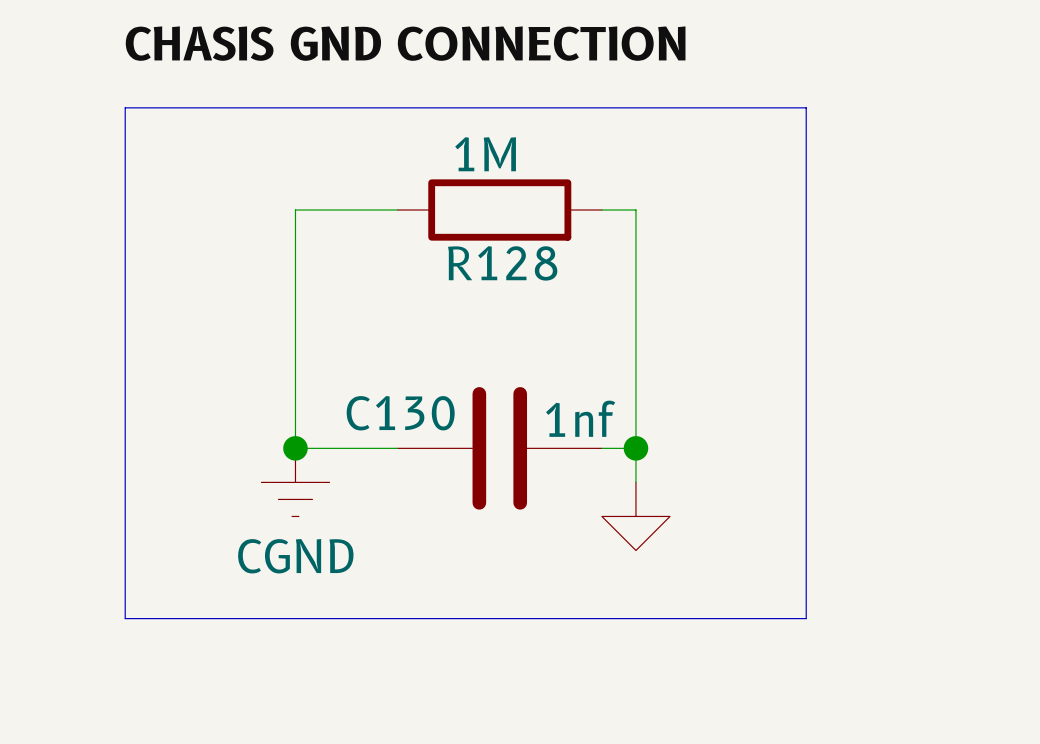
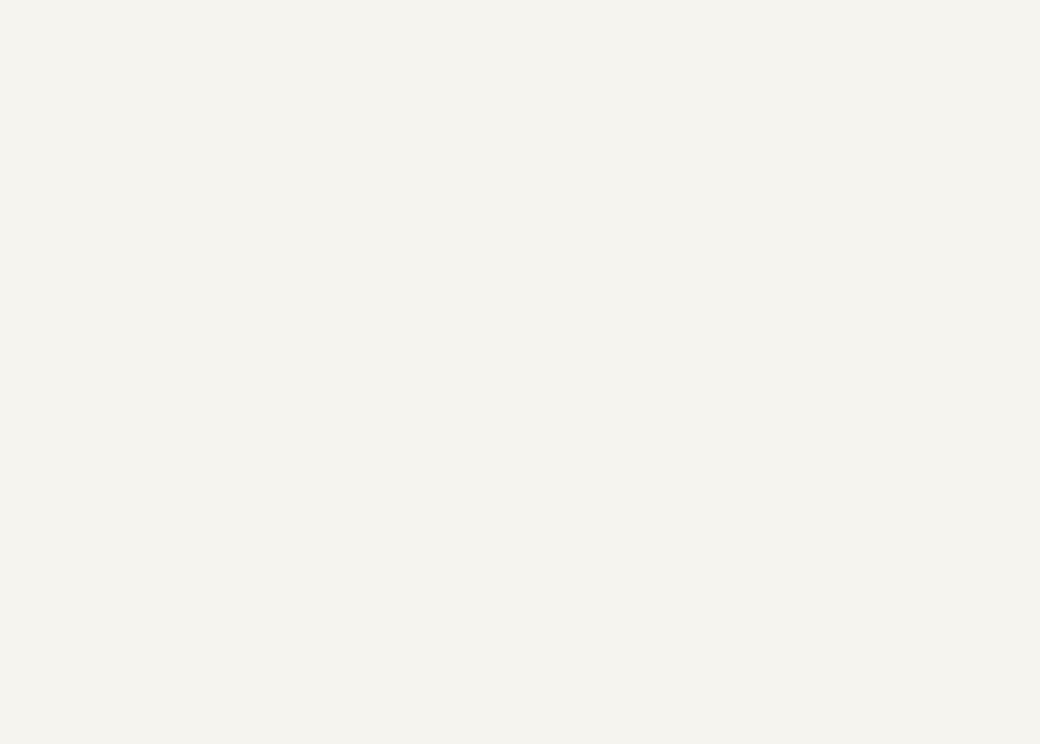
label: CHASIS GND CONNECTION (405, 43) -> none
line: (125, 107) (806, 107) (806, 618) (125, 618) (125, 107) -> none
wire: (397, 210) (295, 210) (295, 448) (397, 448) -> none
R128: 1M (499, 210) -> none
wire: (601, 210) (635, 210) (635, 482) -> none
junction: (295, 448) -> none
C130: 1nf (499, 448) -> none
wire: (601, 448) (635, 448) -> none
junction: (635, 448) -> none
power symbol: CGND (295, 482) -> none
power symbol: (635, 516) -> none

